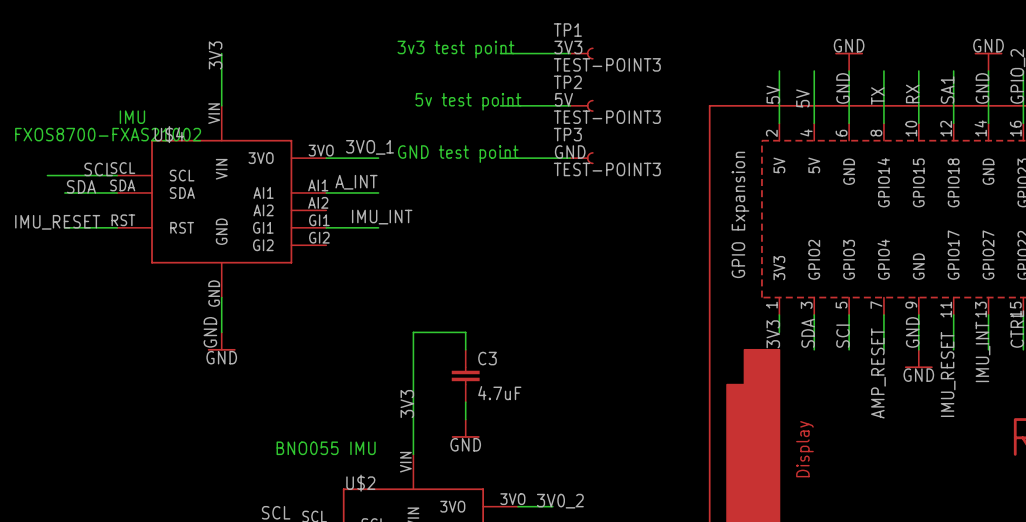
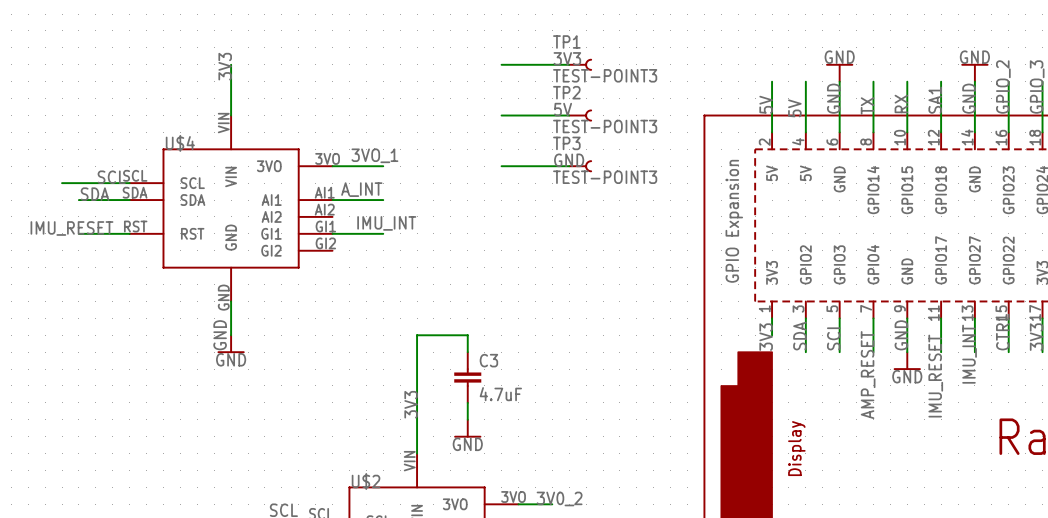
text: 3v3 test point (455, 49) -> none
text: 5v test point (468, 101) -> none
text: IMU (132, 117) -> none
text: FXOS8700-FXAS21002 (108, 134) -> none
text: GND test point (458, 154) -> none
text: BNO055 IMU (326, 448) -> none

